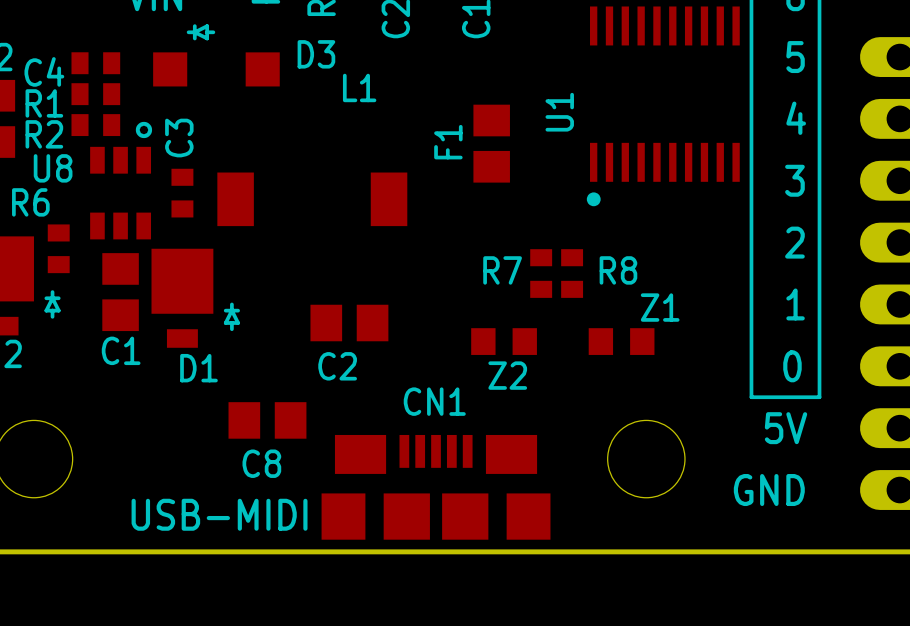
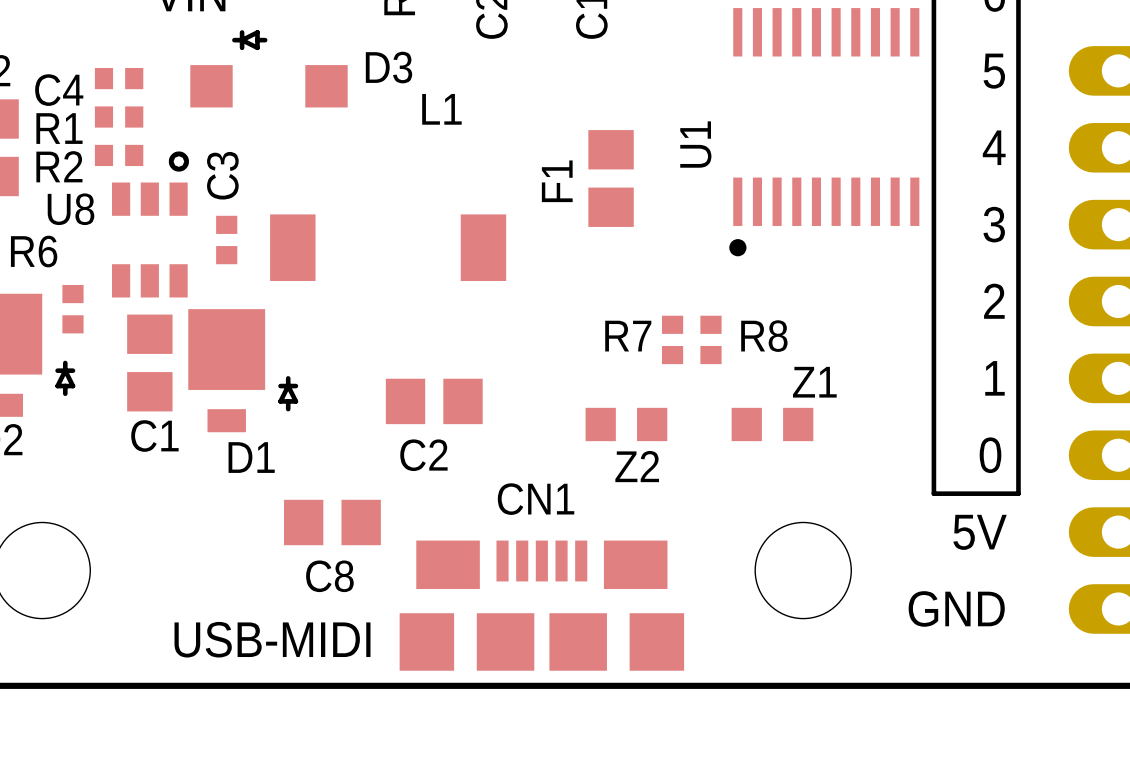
C4 footprint: [71, 52, 121, 75] -> [94, 67, 144, 90]
R1 footprint: [71, 83, 121, 106] -> [94, 106, 144, 128]
R2 footprint: [71, 114, 121, 137] -> [94, 144, 144, 167]
C3 footprint: [171, 168, 194, 218] -> [216, 215, 238, 265]
R6 footprint: [47, 224, 70, 274] -> [62, 284, 84, 334]
R7 footprint: [530, 249, 553, 298] -> [661, 315, 684, 365]
R8 footprint: [561, 249, 584, 298] -> [700, 315, 722, 365]

